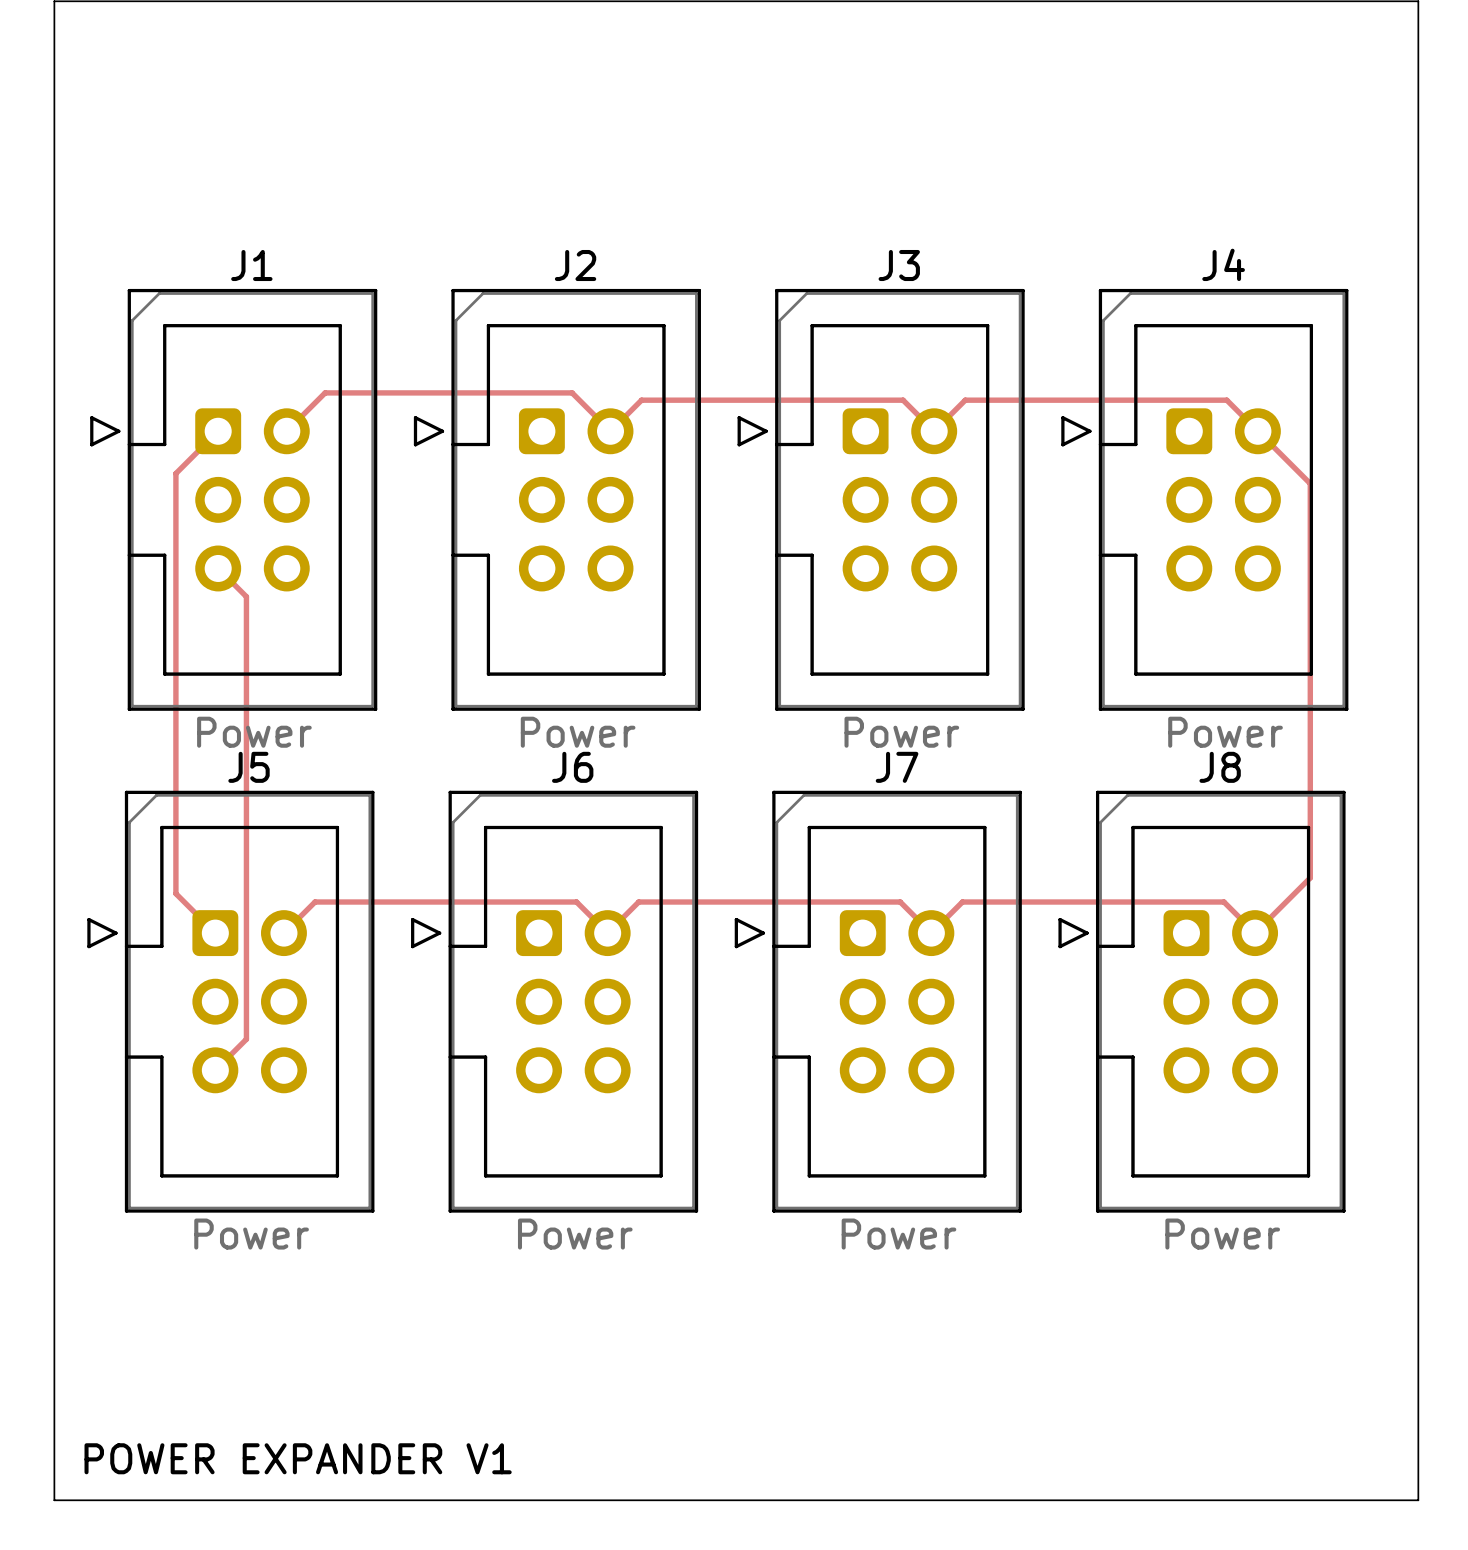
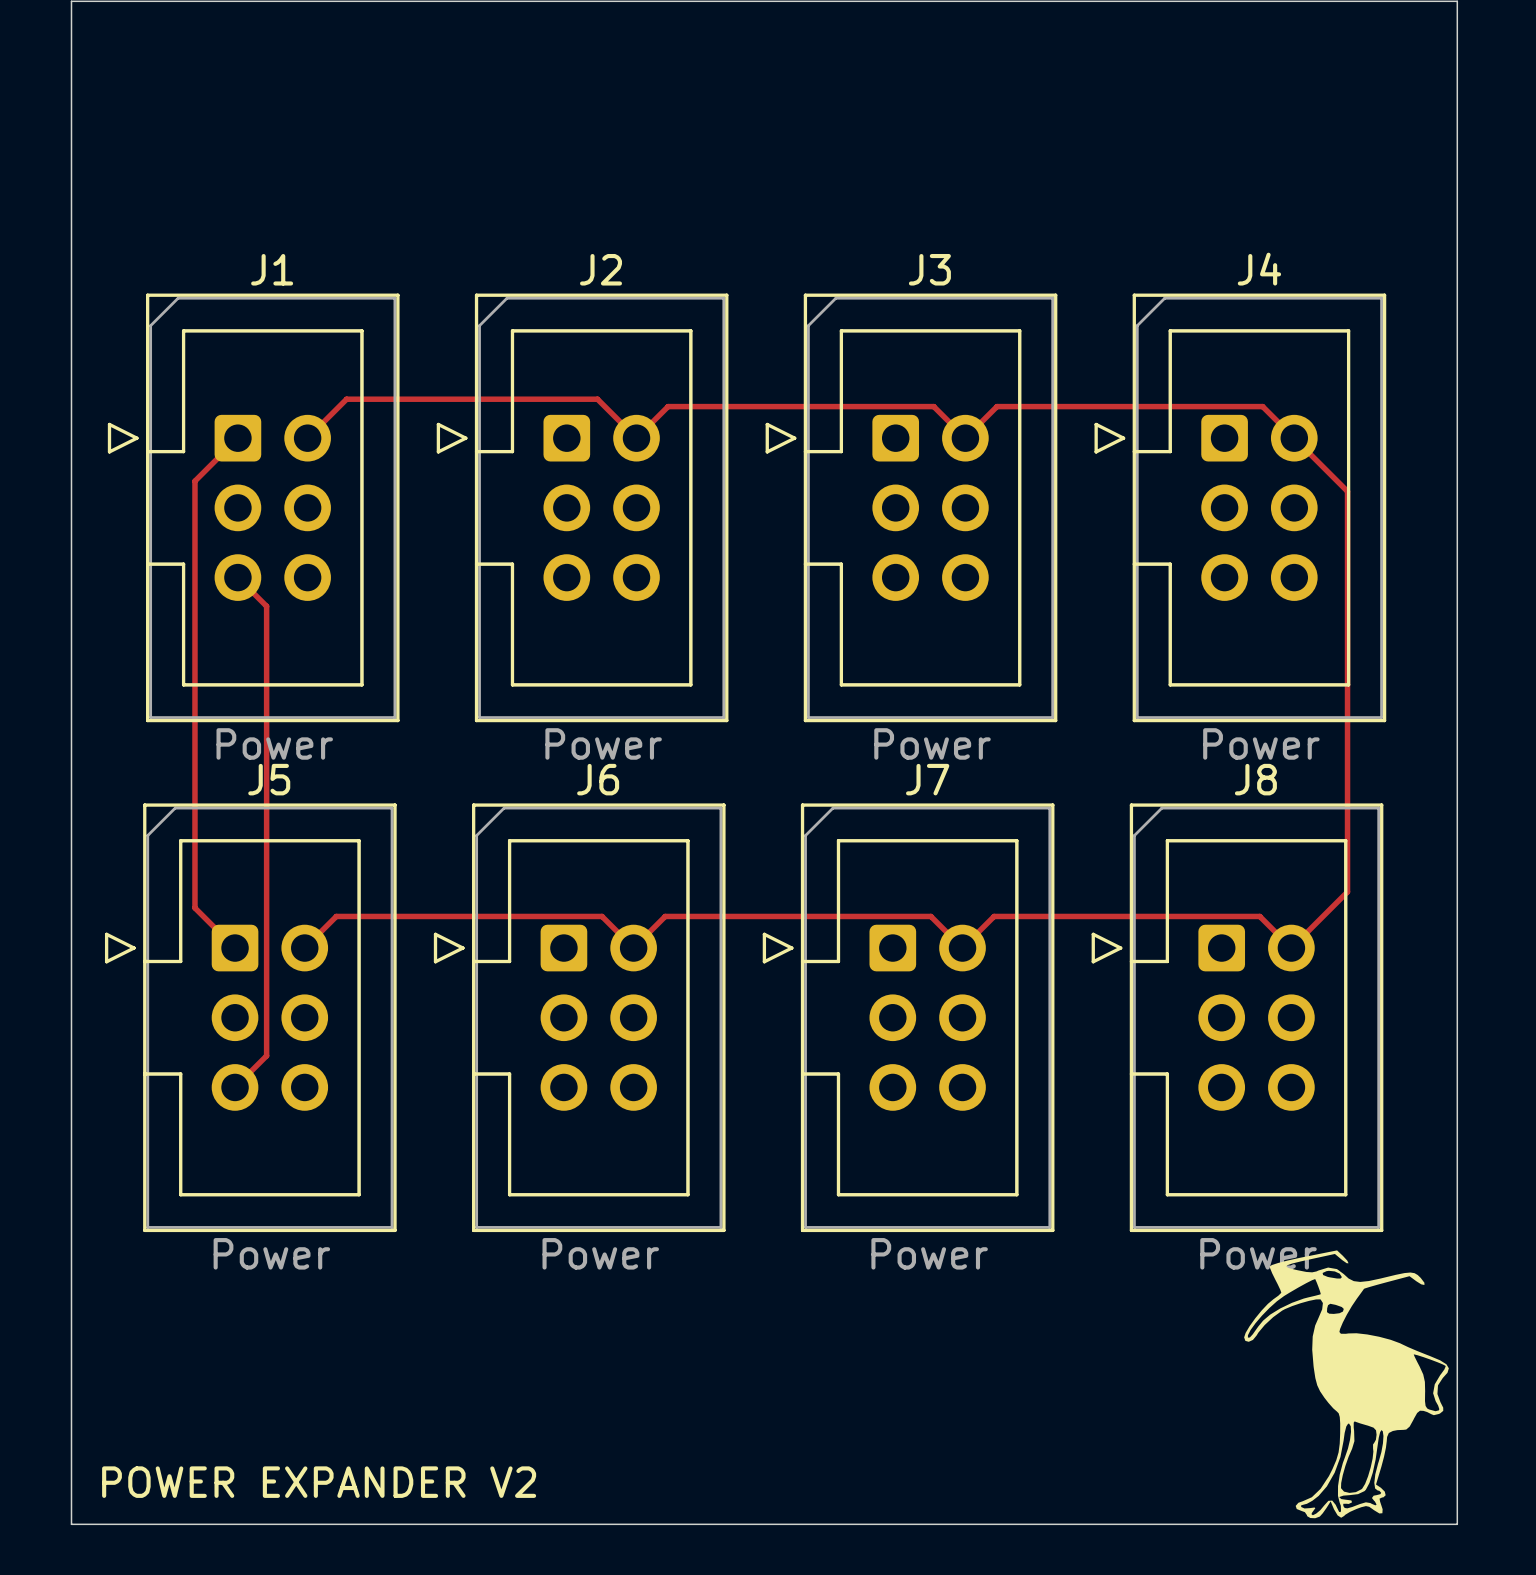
drawing: none -> [1244, 1250, 1449, 1519]
text: POWER EXPANDER V1 (298, 1458) -> POWER EXPANDER V2 (319, 1482)

